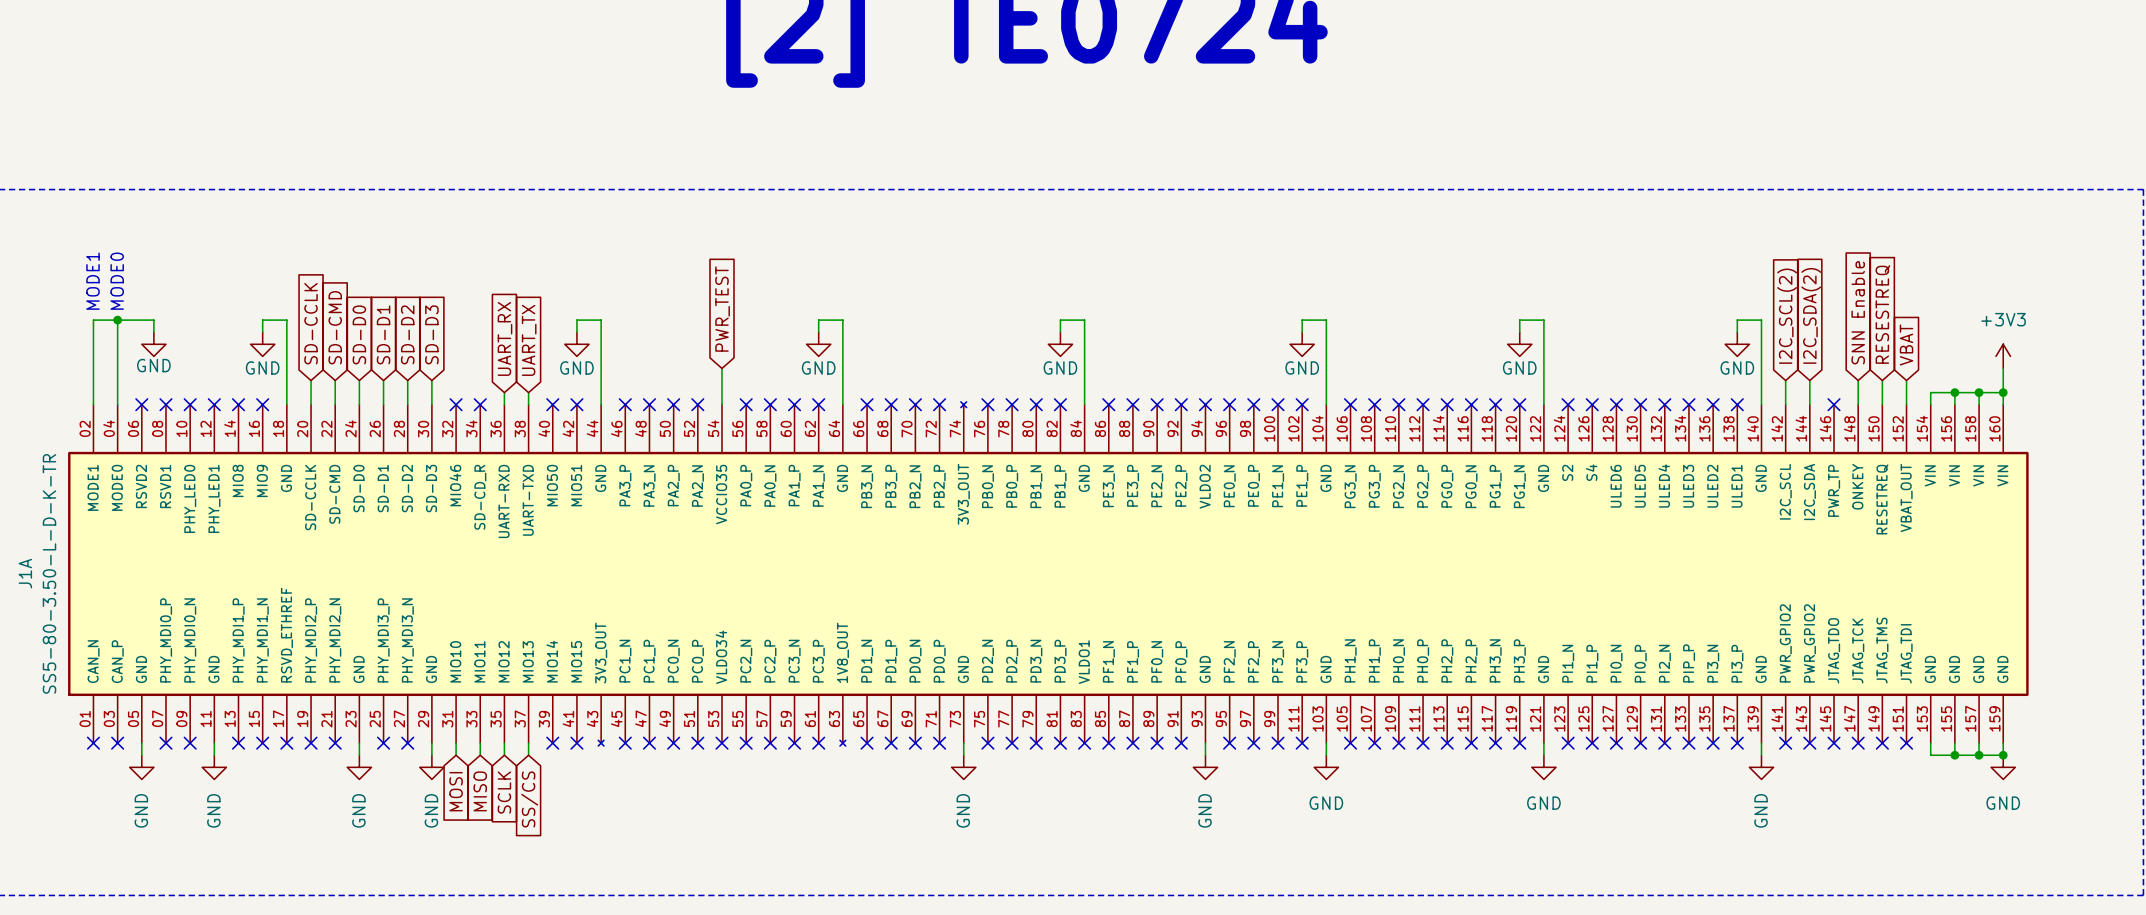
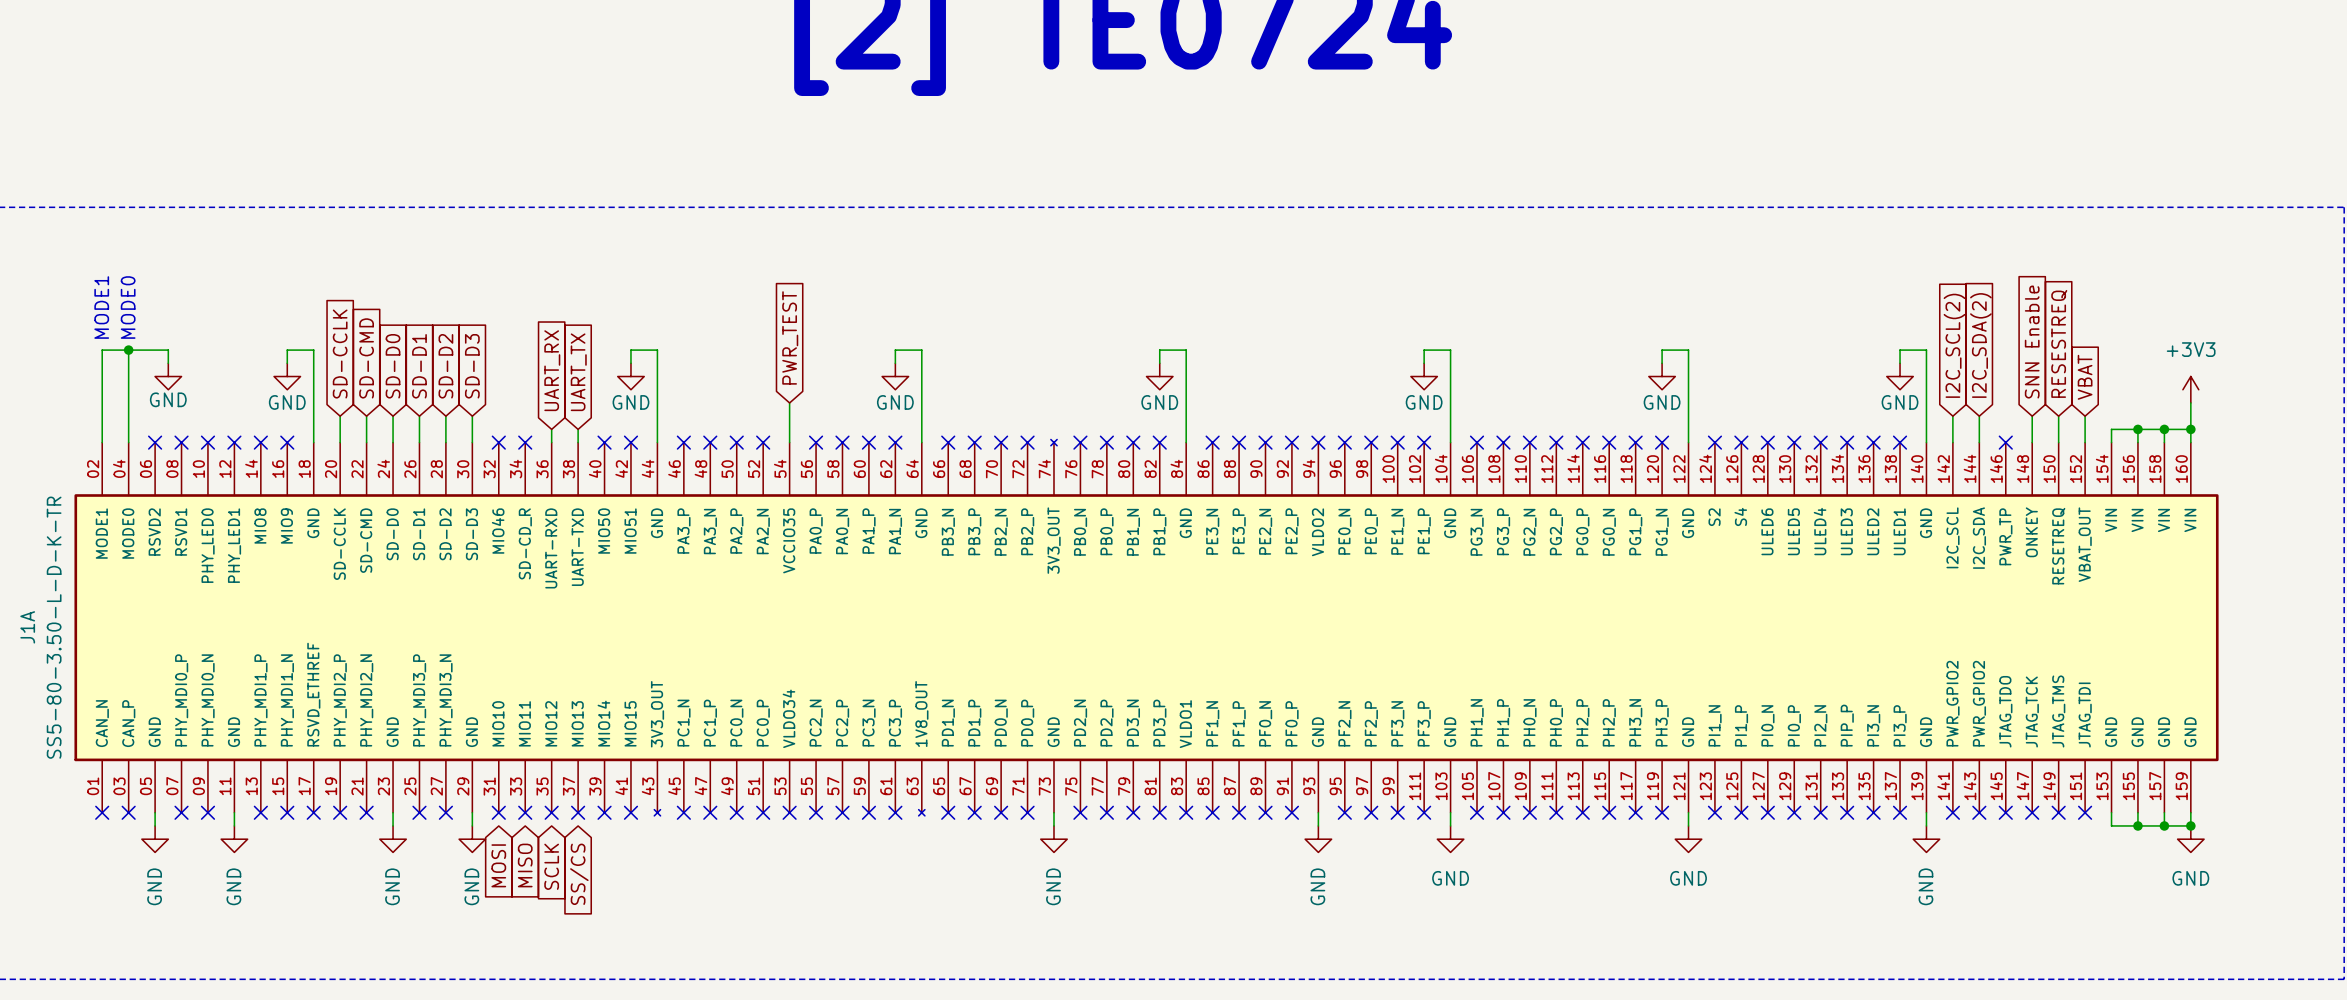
wire: (456, 743) (456, 755) -> none
no-connect mark: none -> (498, 812)
wire: (480, 743) (480, 755) -> none
no-connect mark: none -> (525, 812)
wire: (504, 743) (504, 755) -> none
no-connect mark: none -> (551, 812)
wire: (528, 743) (528, 755) -> none
no-connect mark: none -> (578, 812)

